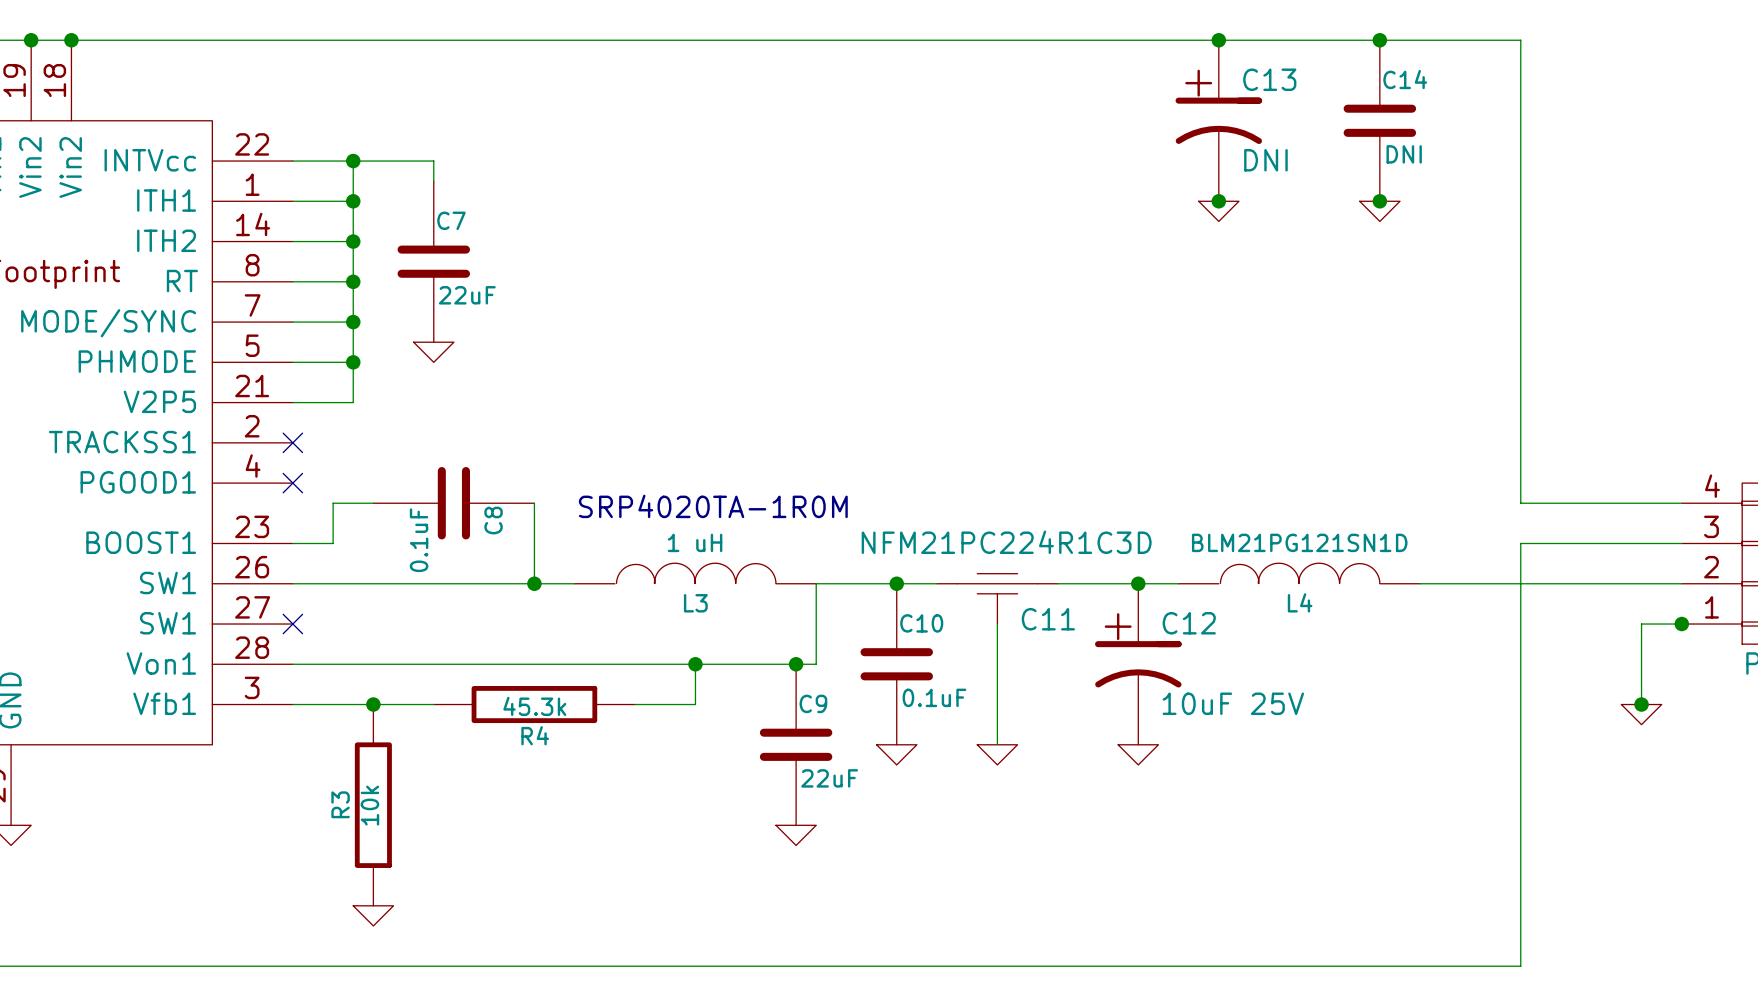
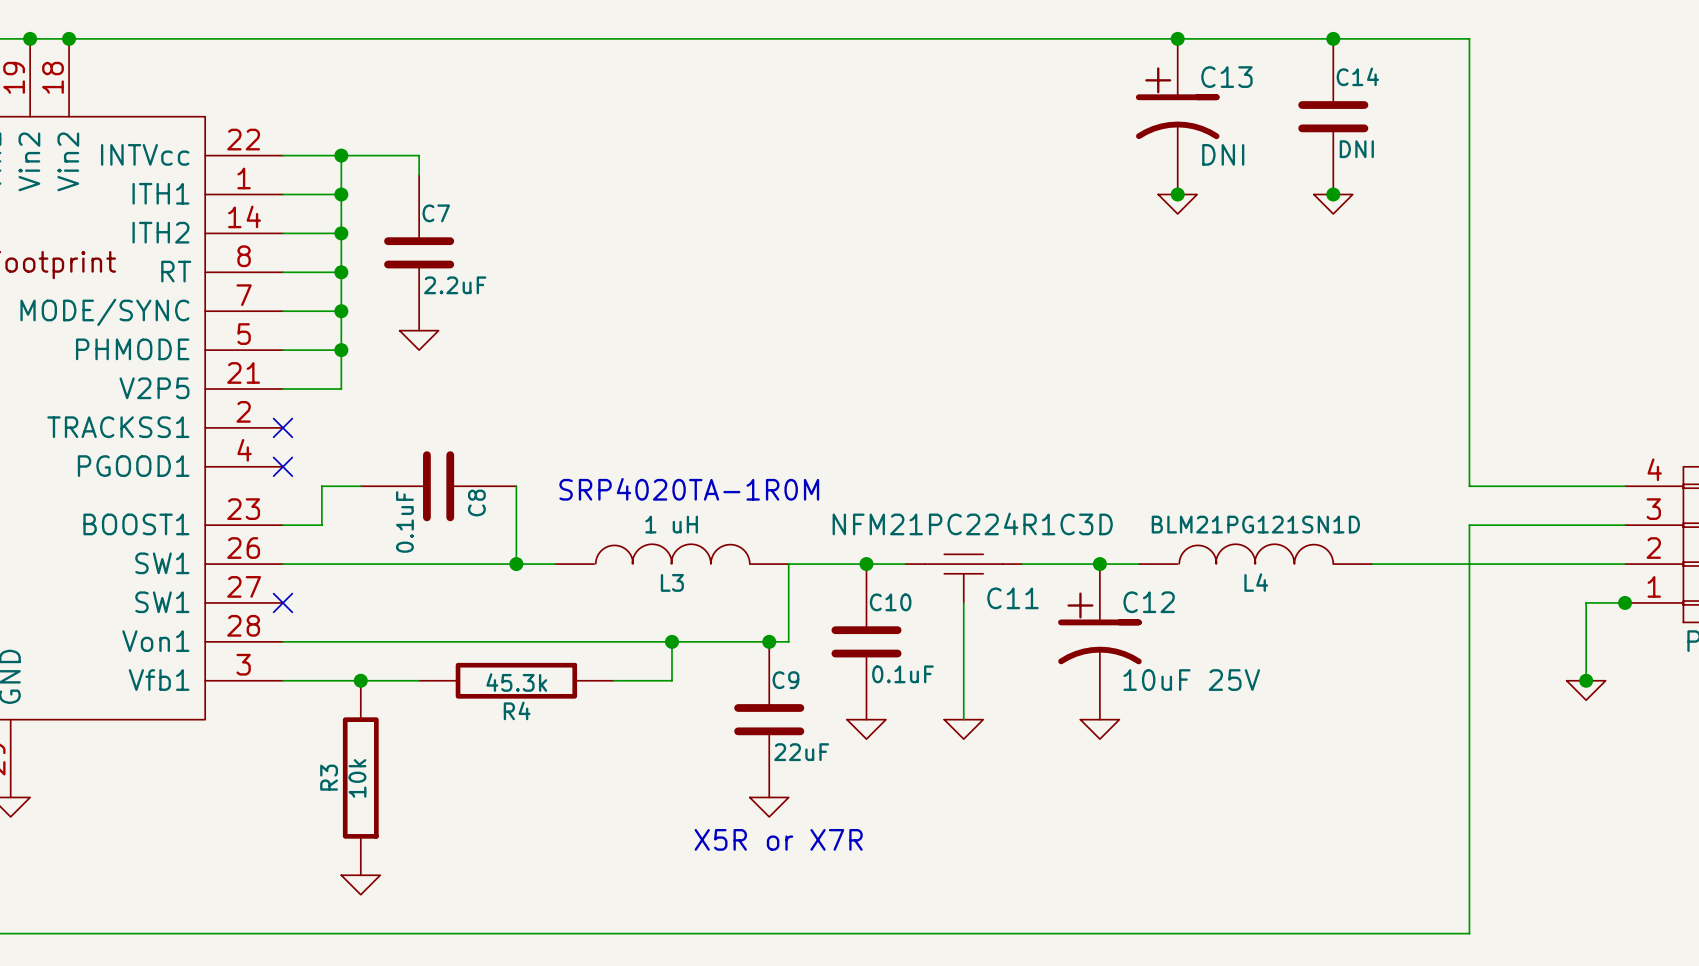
C7 value: 22uF (467, 295) -> 2.2uF (455, 285)
text: none -> X5R or X7R (778, 839)

